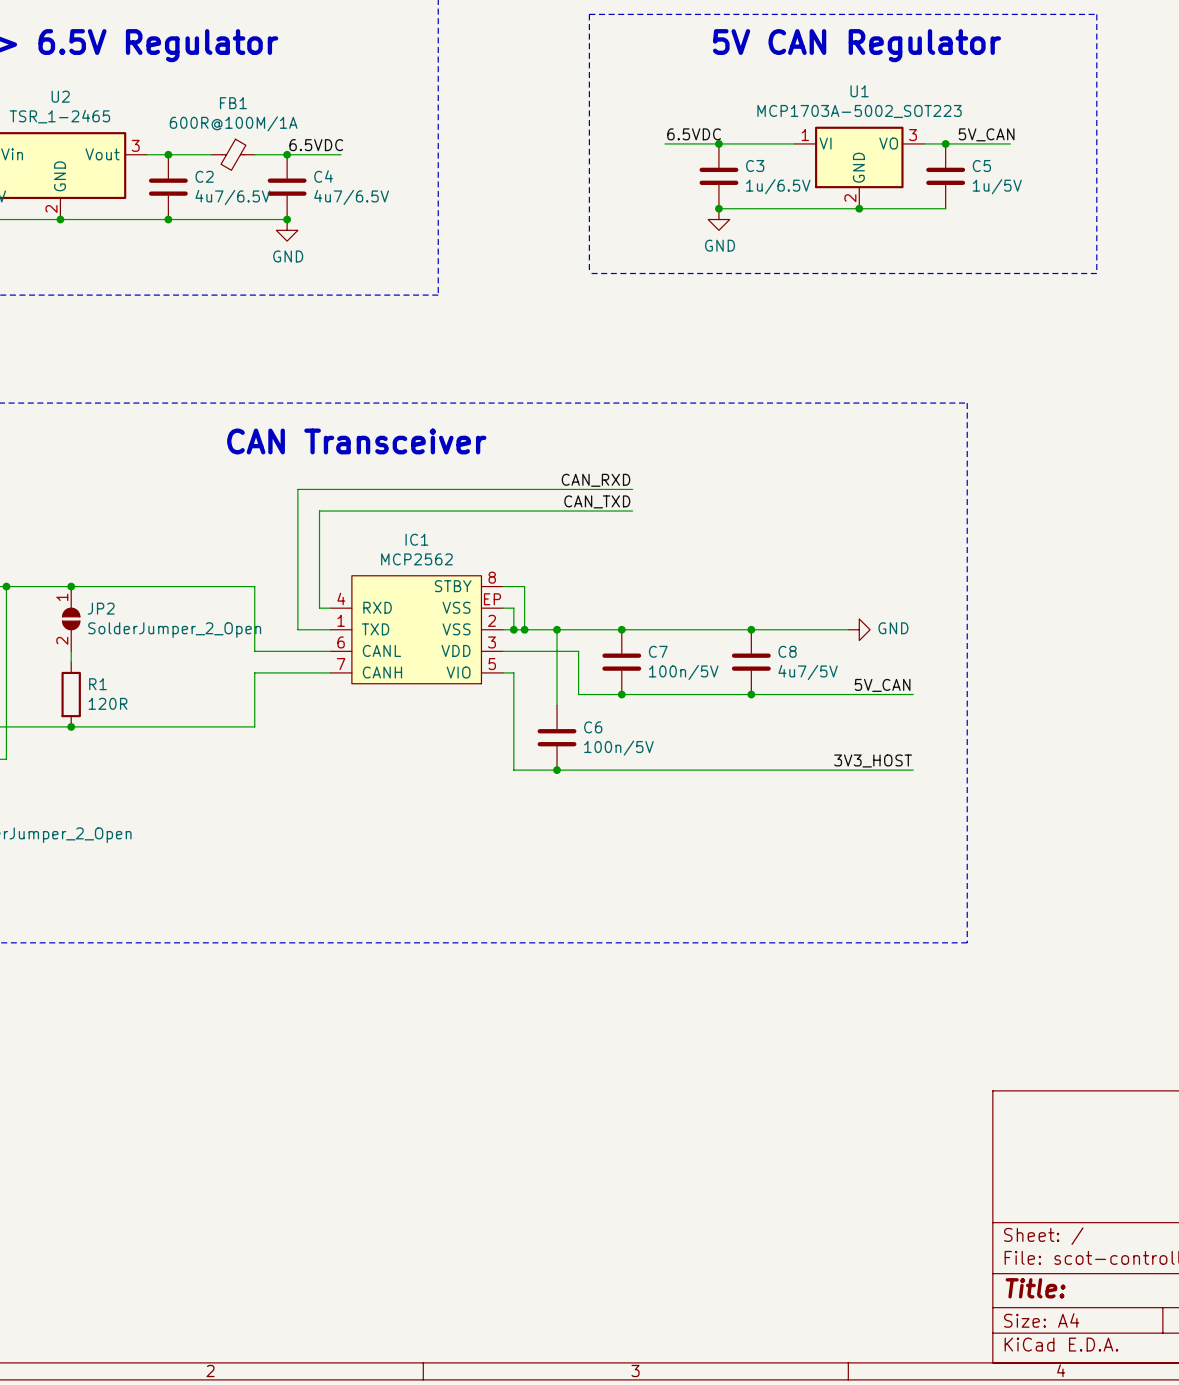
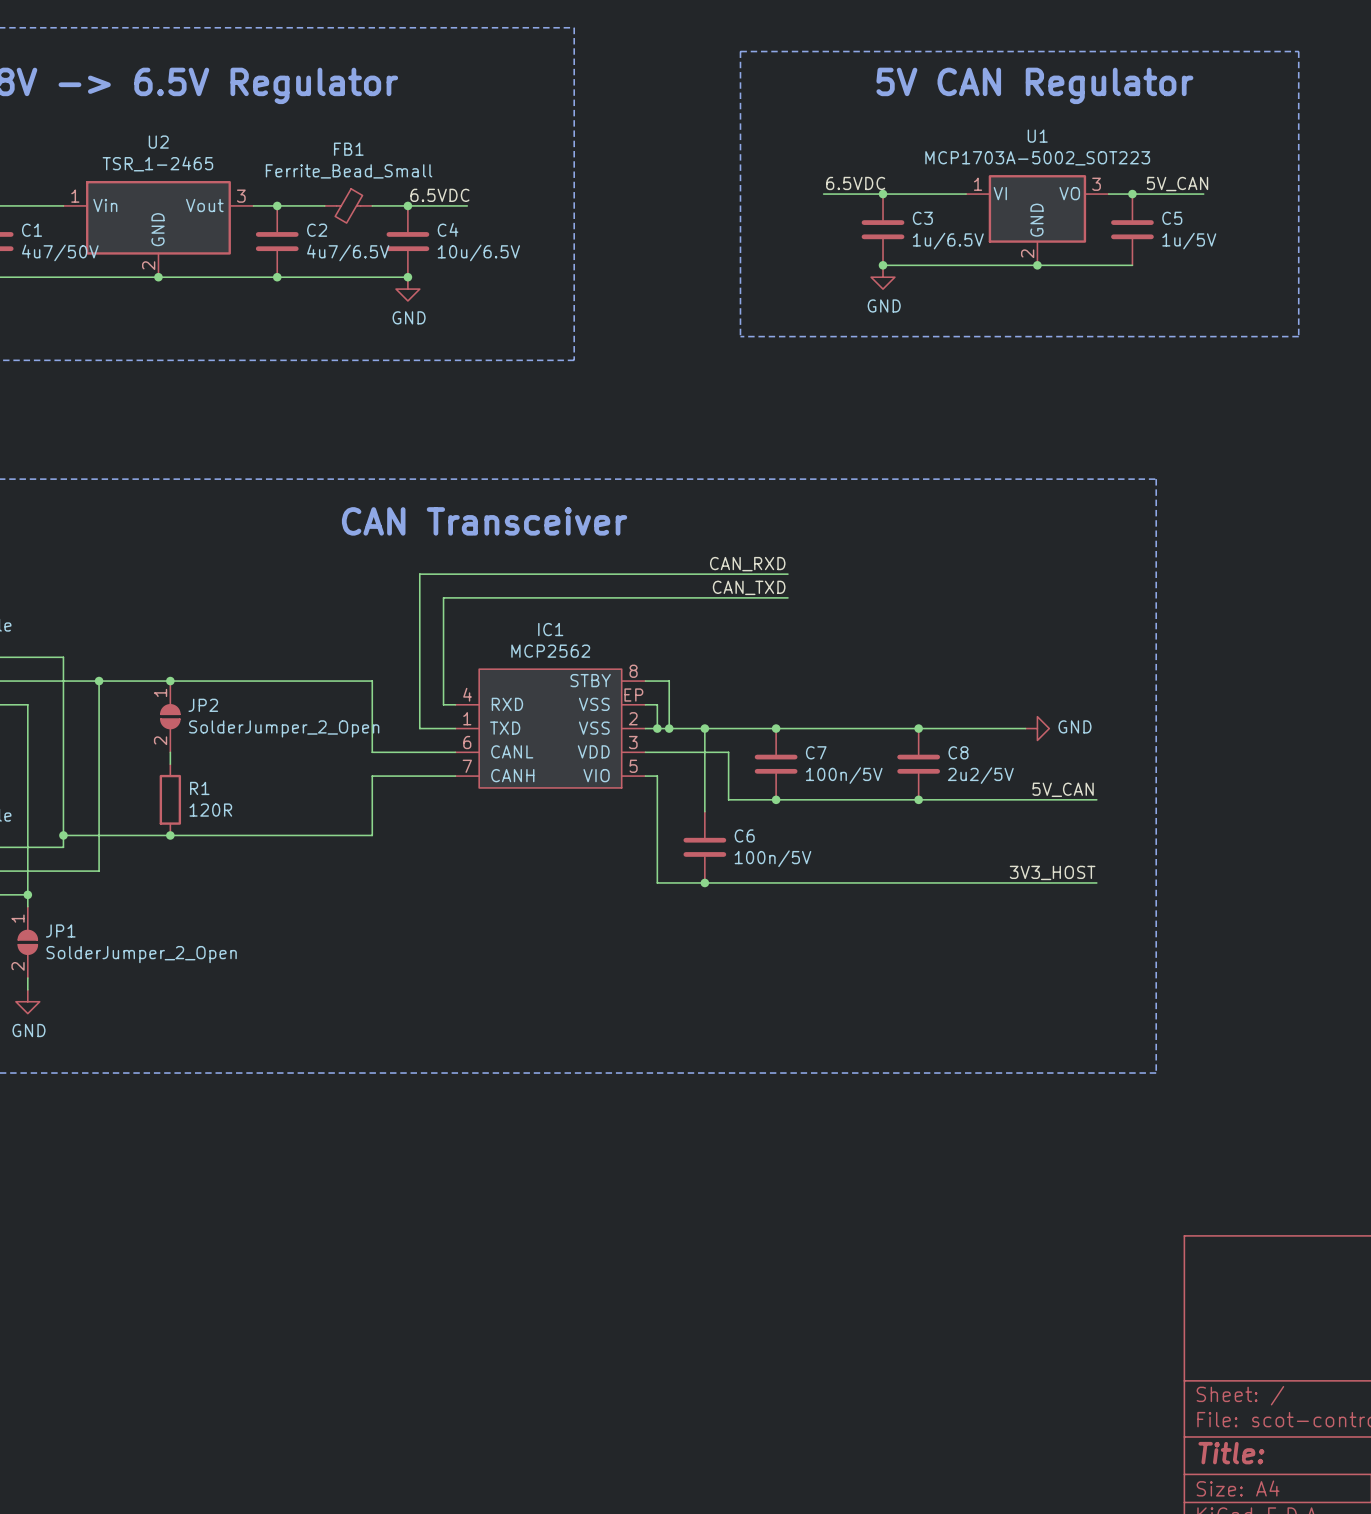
FB1 value: 600R@100M/1A (233, 123) -> Ferrite_Bead_Small (349, 171)
C4 value: 4u7/6.5V (351, 197) -> 10u/6.5V (478, 252)
C8 value: 4u7/5V (808, 672) -> 2u2/5V (980, 775)

